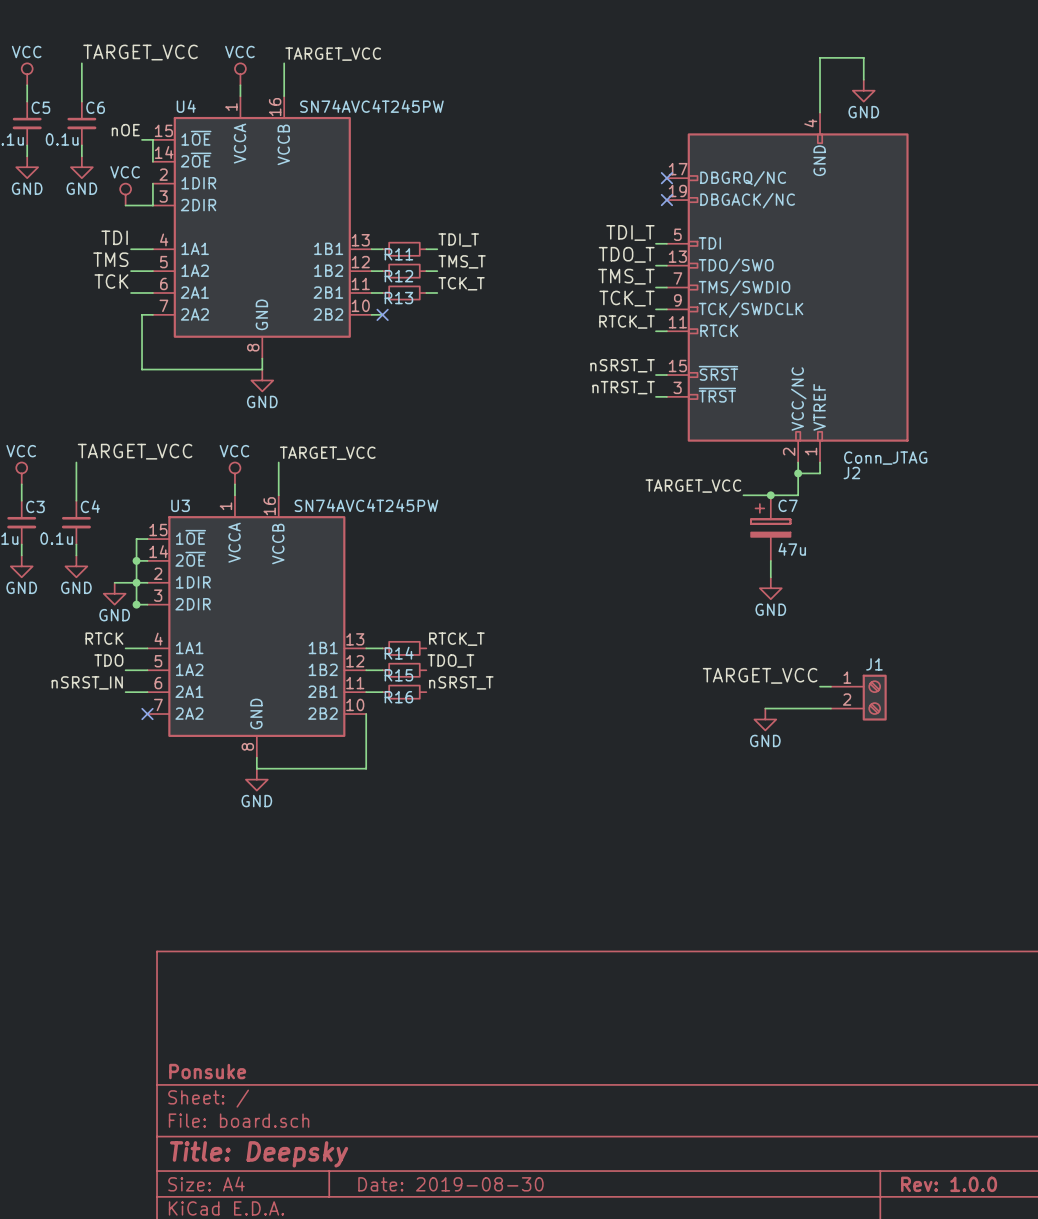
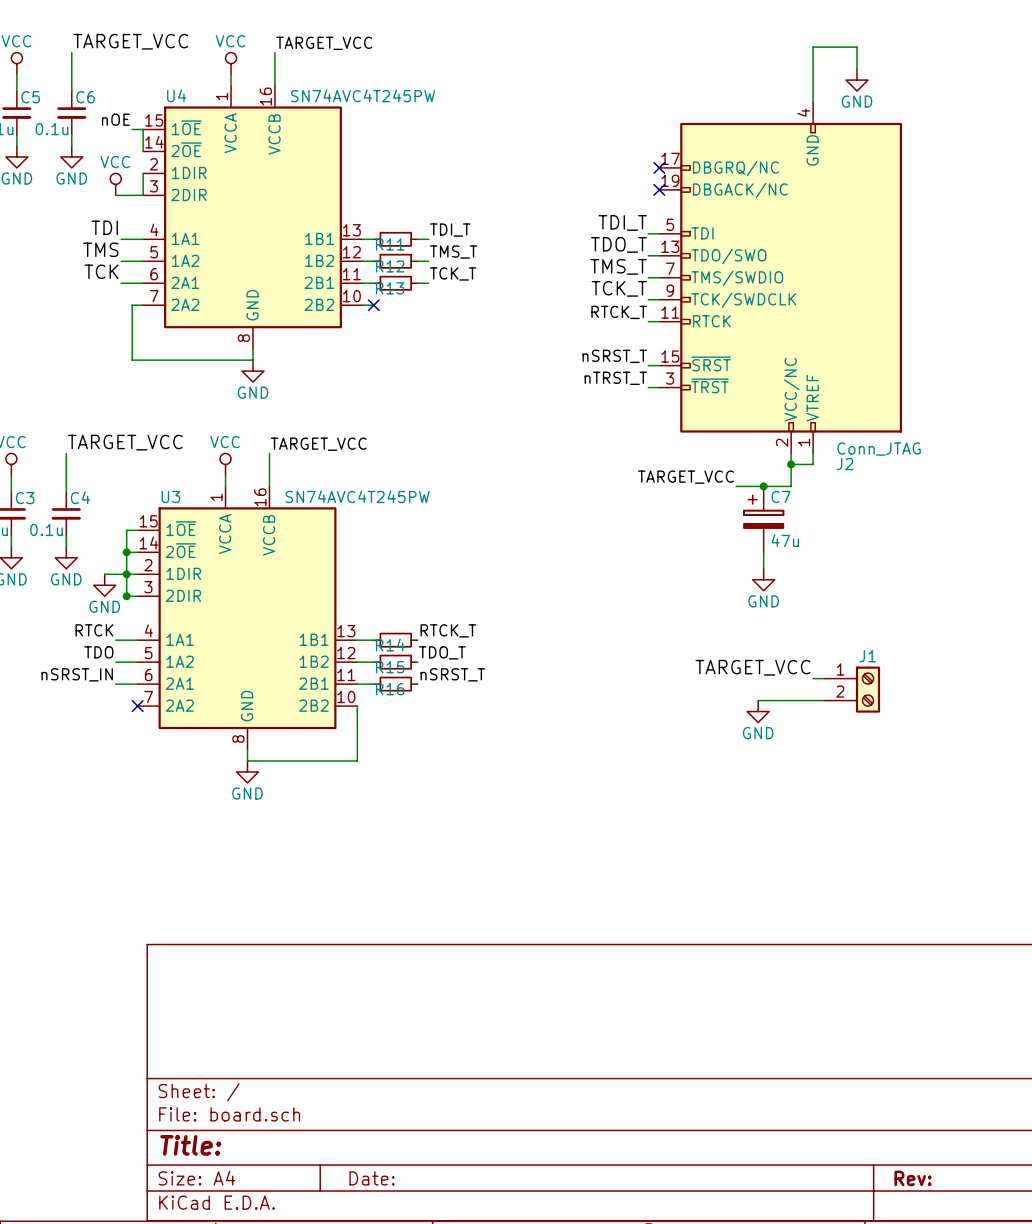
title block: Ponsuke (207, 1071) -> none
title block: Title: Deepsky (259, 1154) -> Title: (190, 1145)
title block: Date: 2019-08-30 (450, 1184) -> Date: (372, 1178)
title block: Rev: 1.0.0 (949, 1184) -> Rev: (913, 1178)

